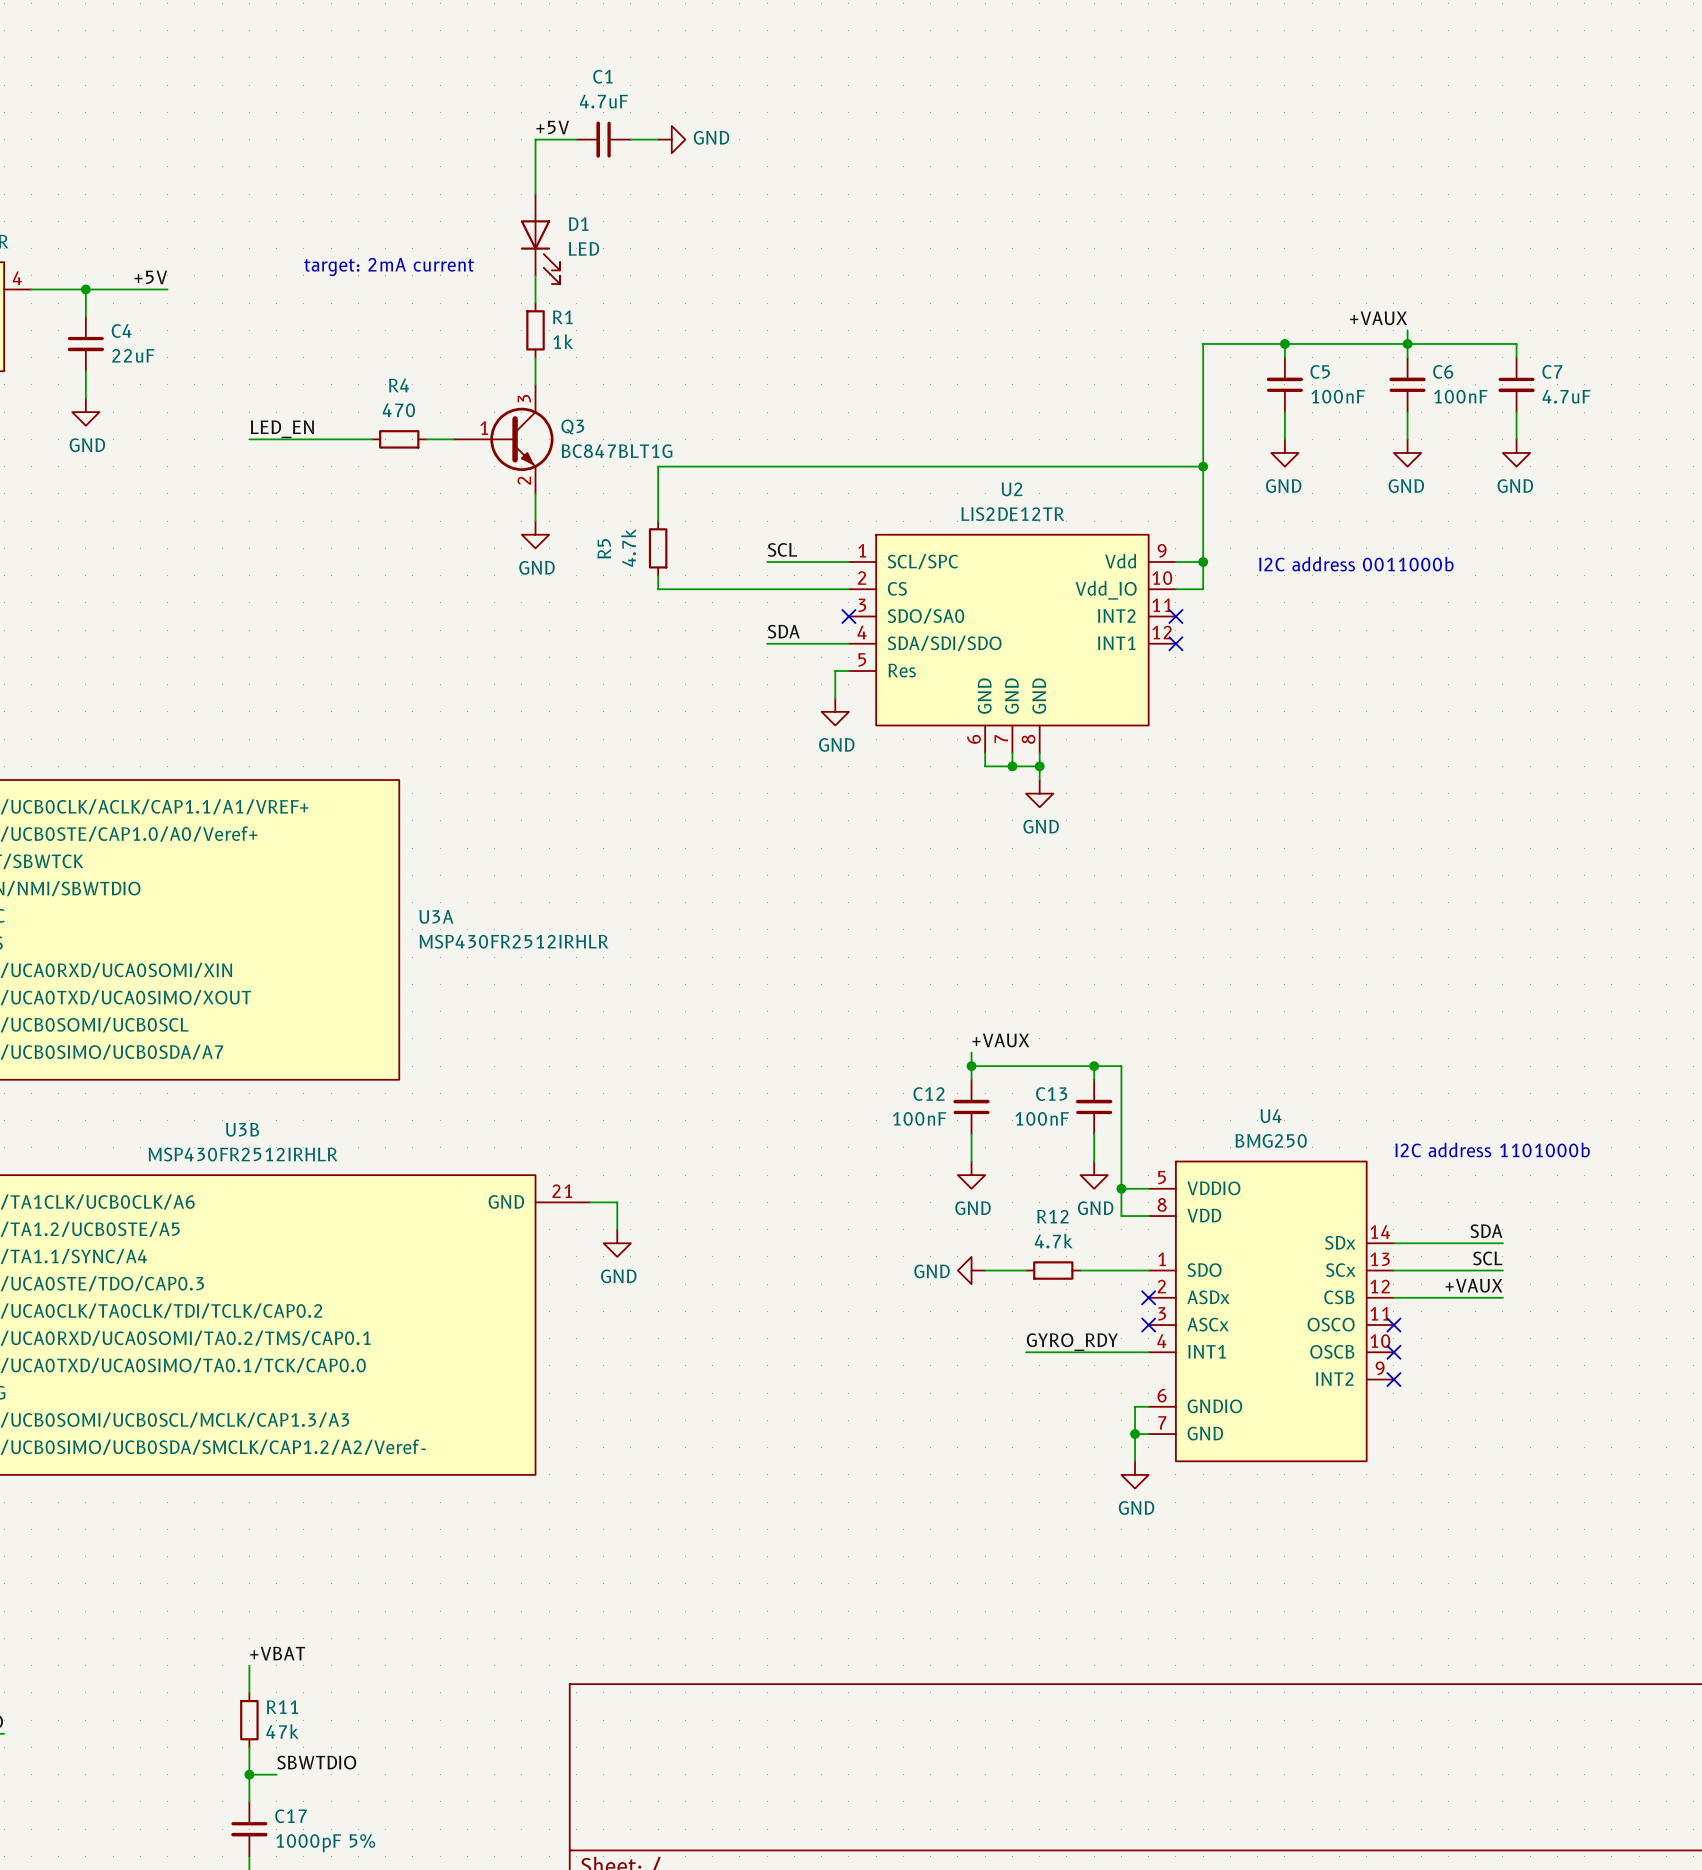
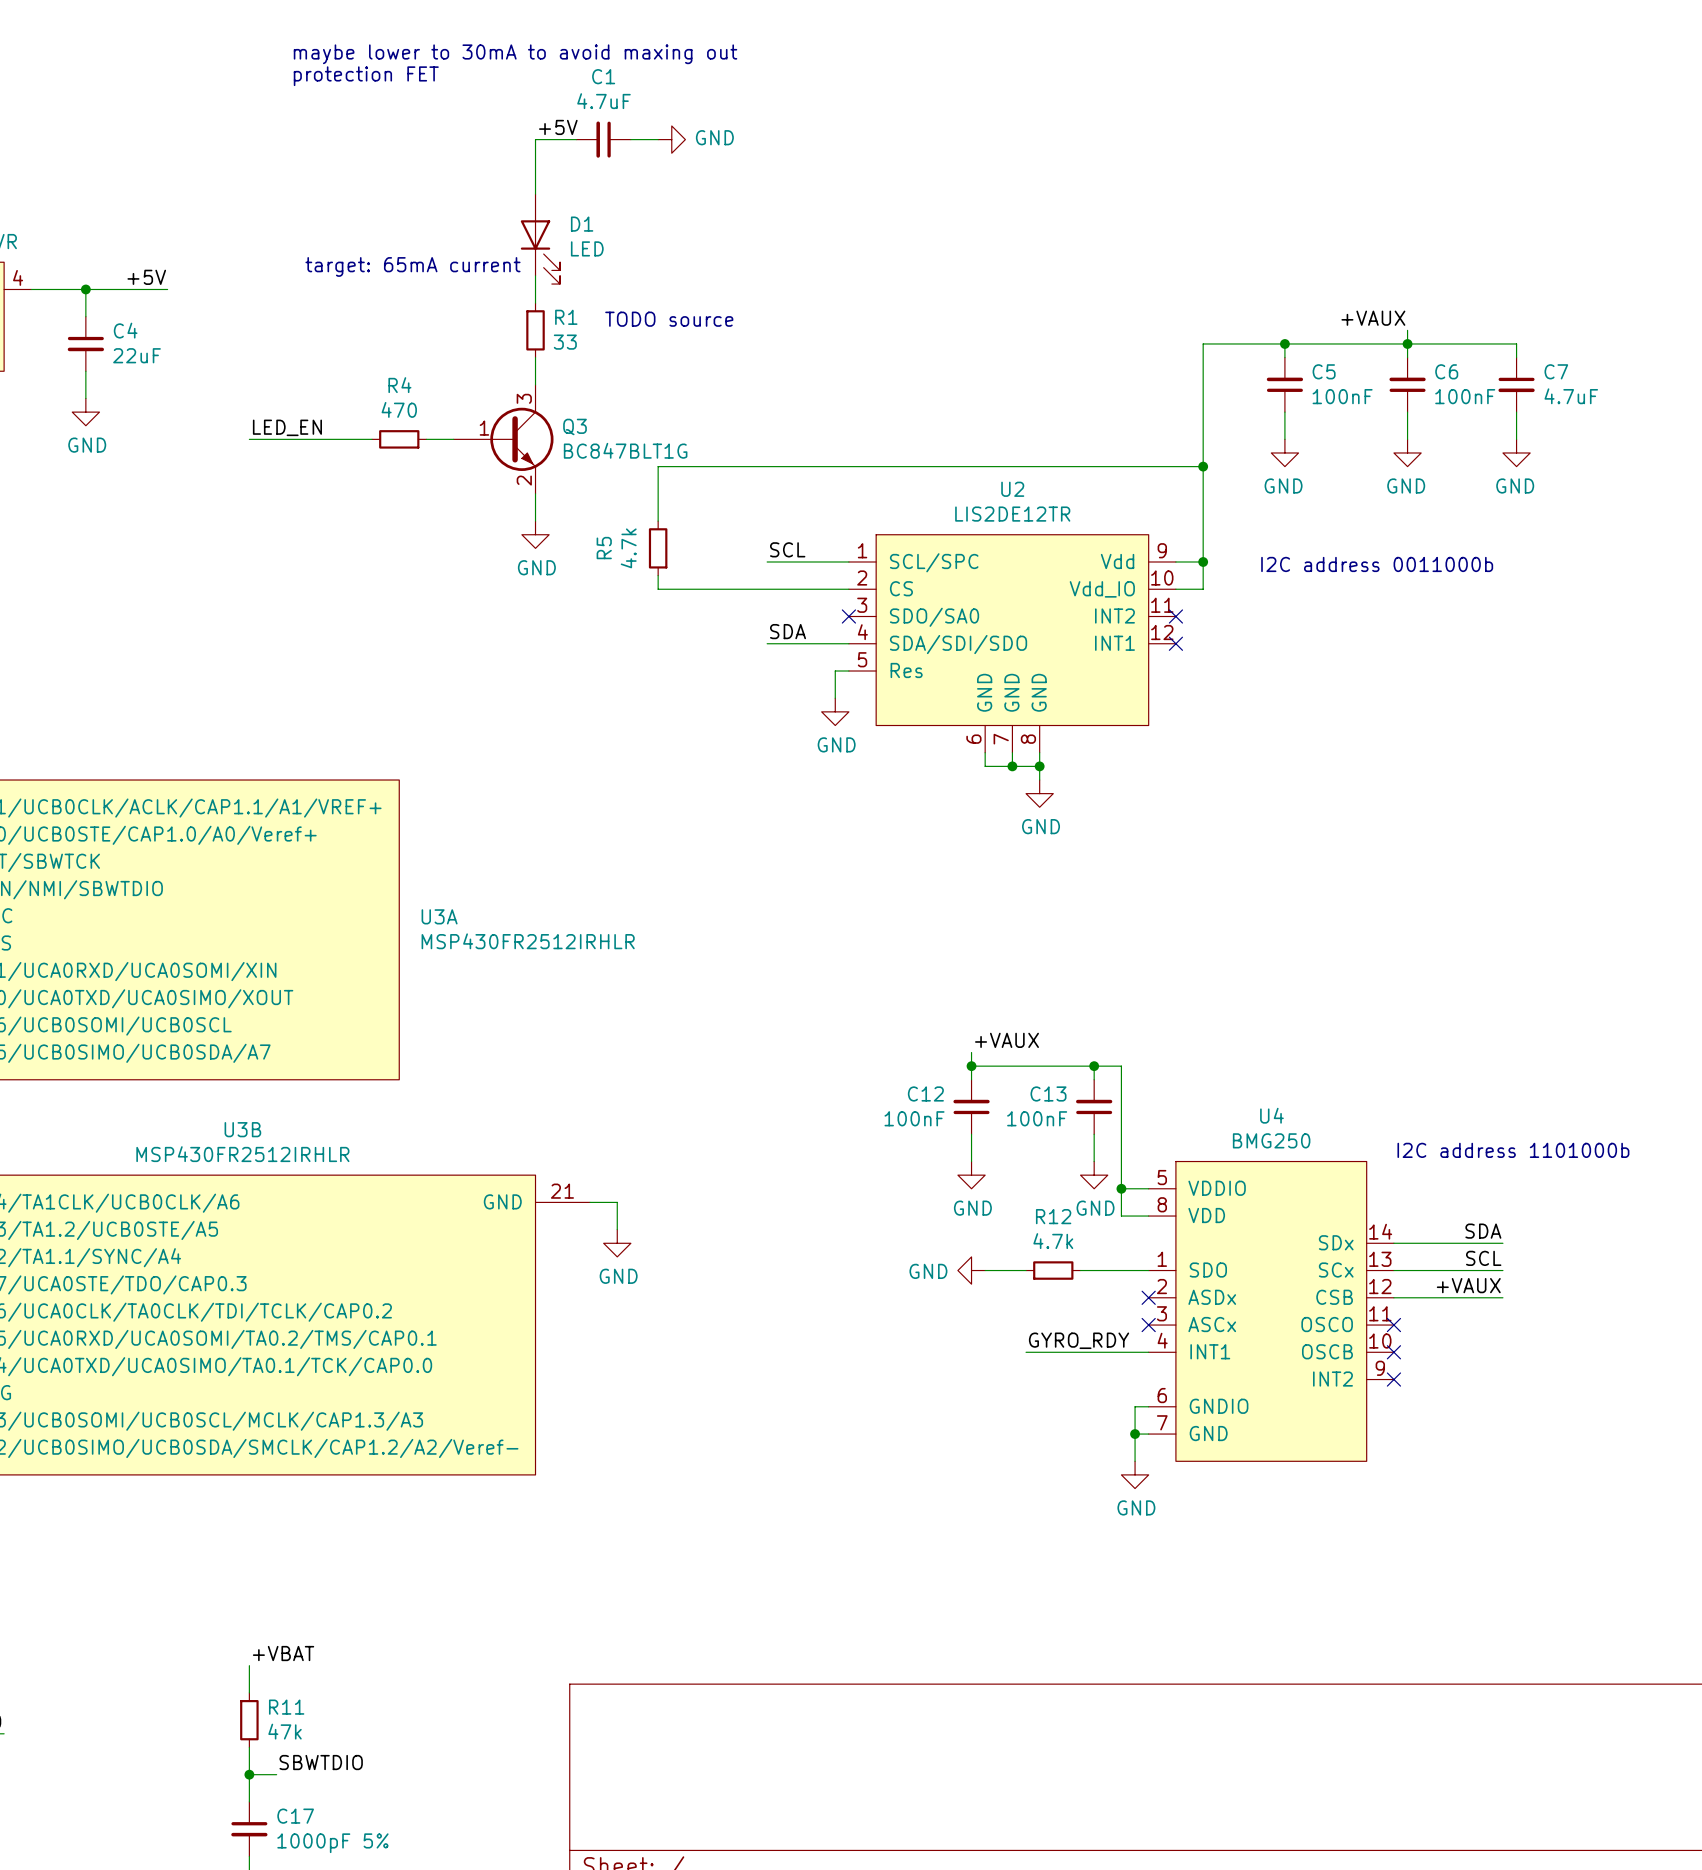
text: none -> maybe lower to 30mA to avoid maxing out (515, 54)
text: none -> protection FET (366, 76)
text: target: 2mA current (389, 267) -> target: 65mA current (412, 266)
text: none -> TODO source (669, 319)
R1 value: 1k (563, 341) -> 33 (565, 342)

